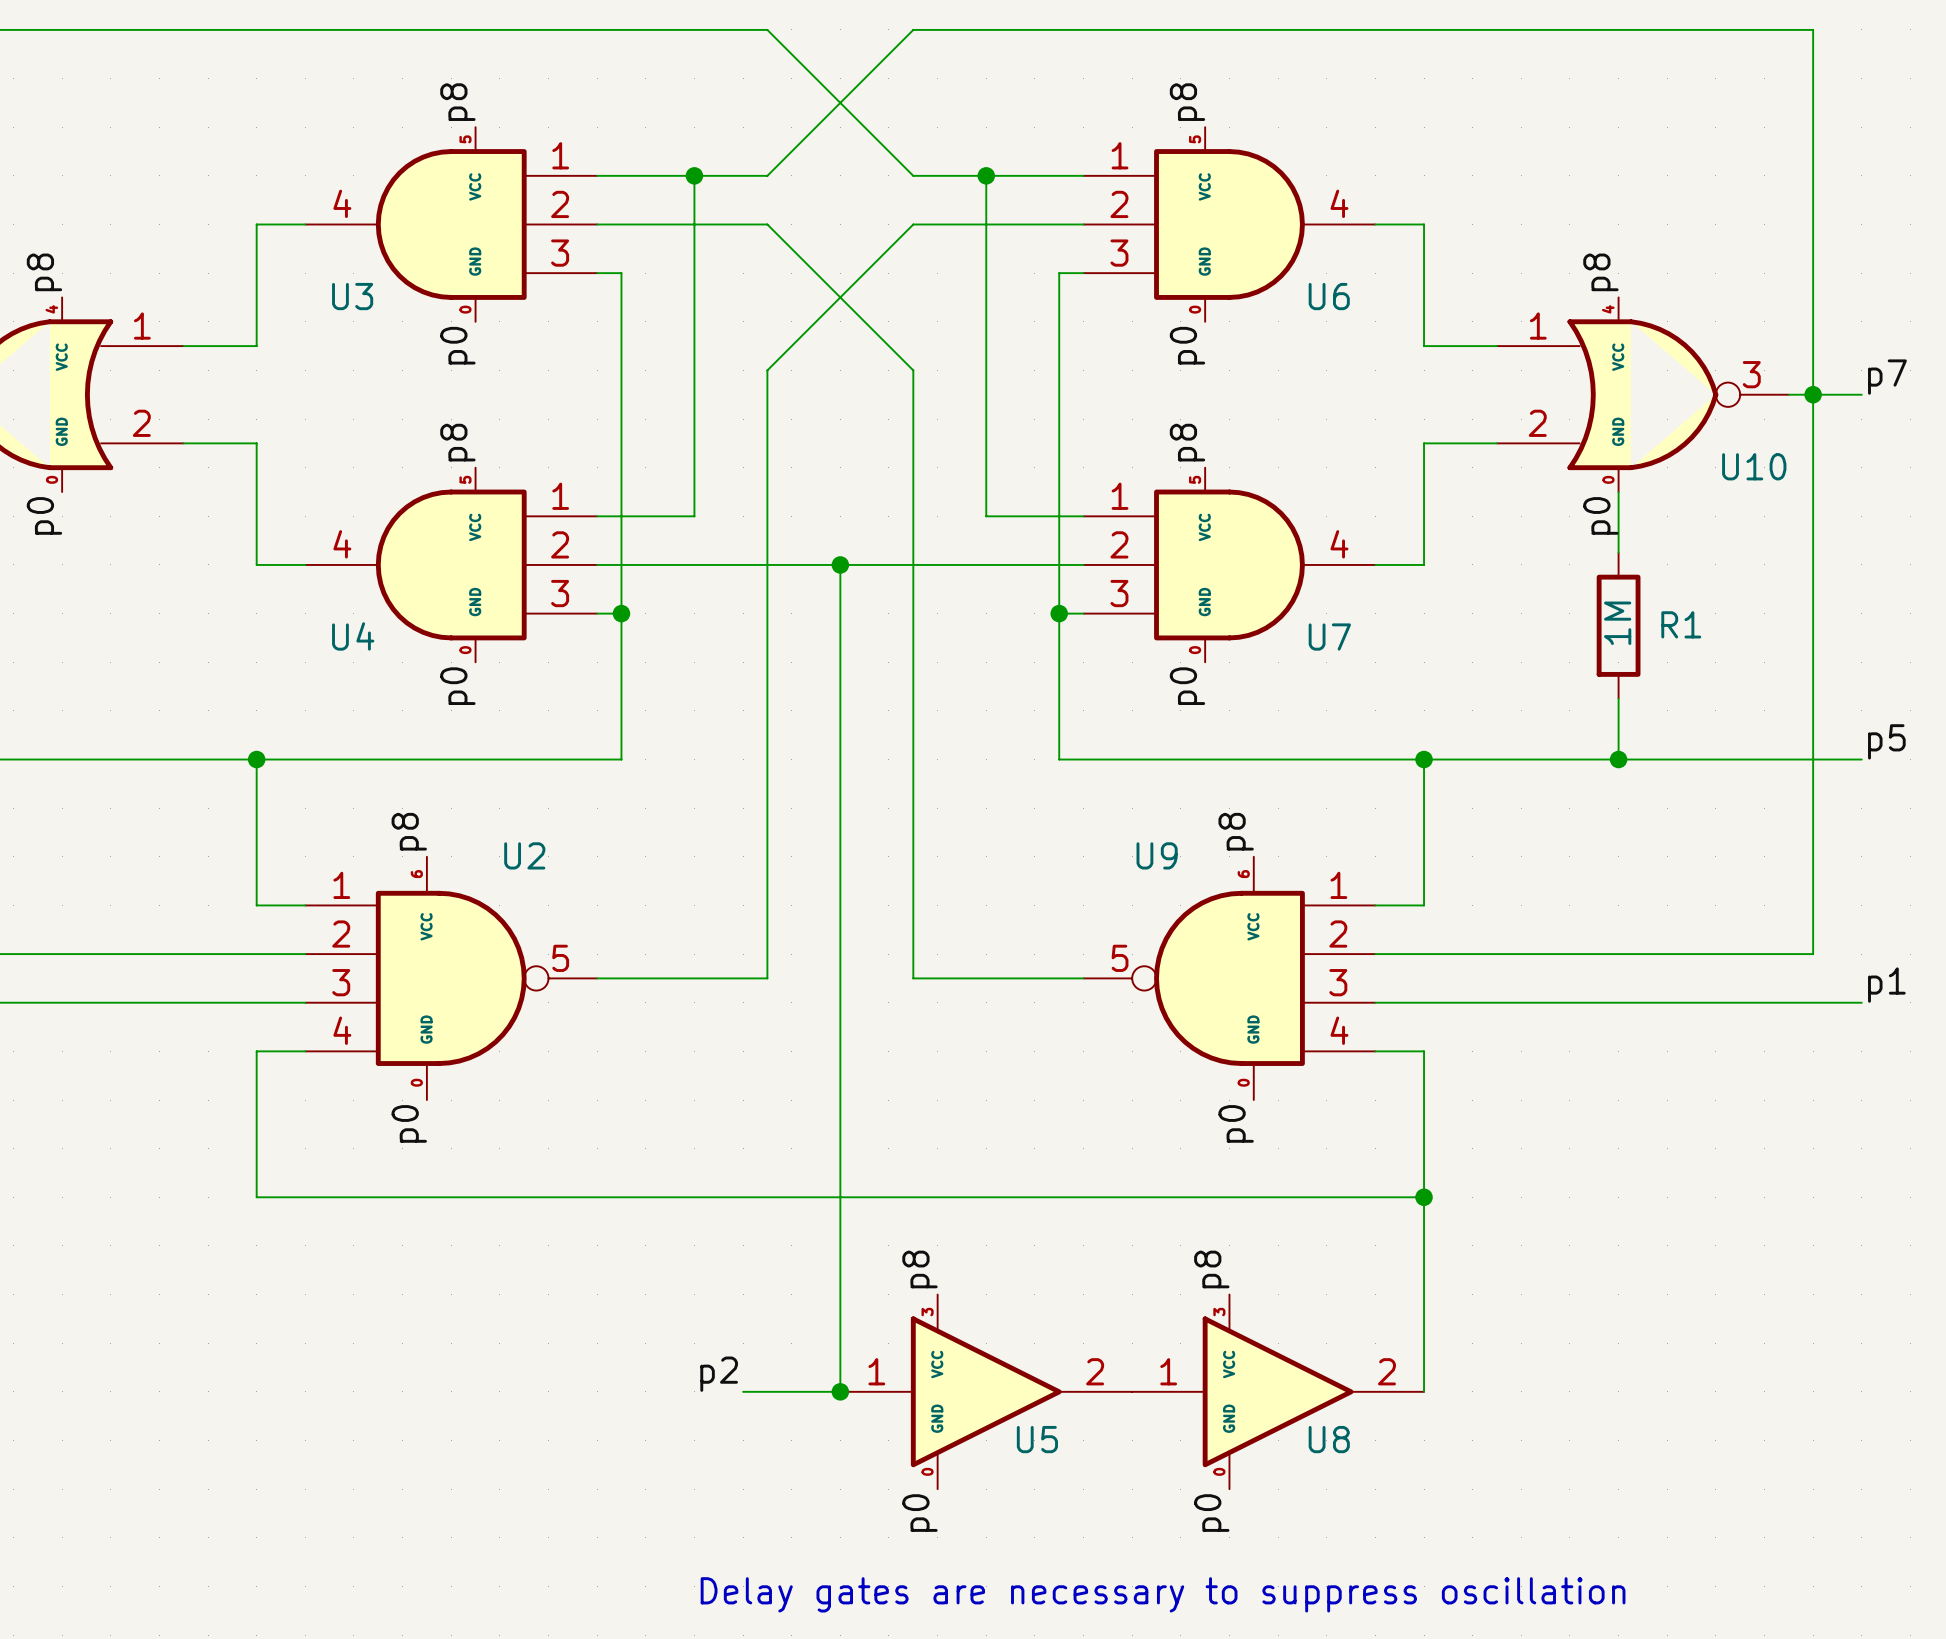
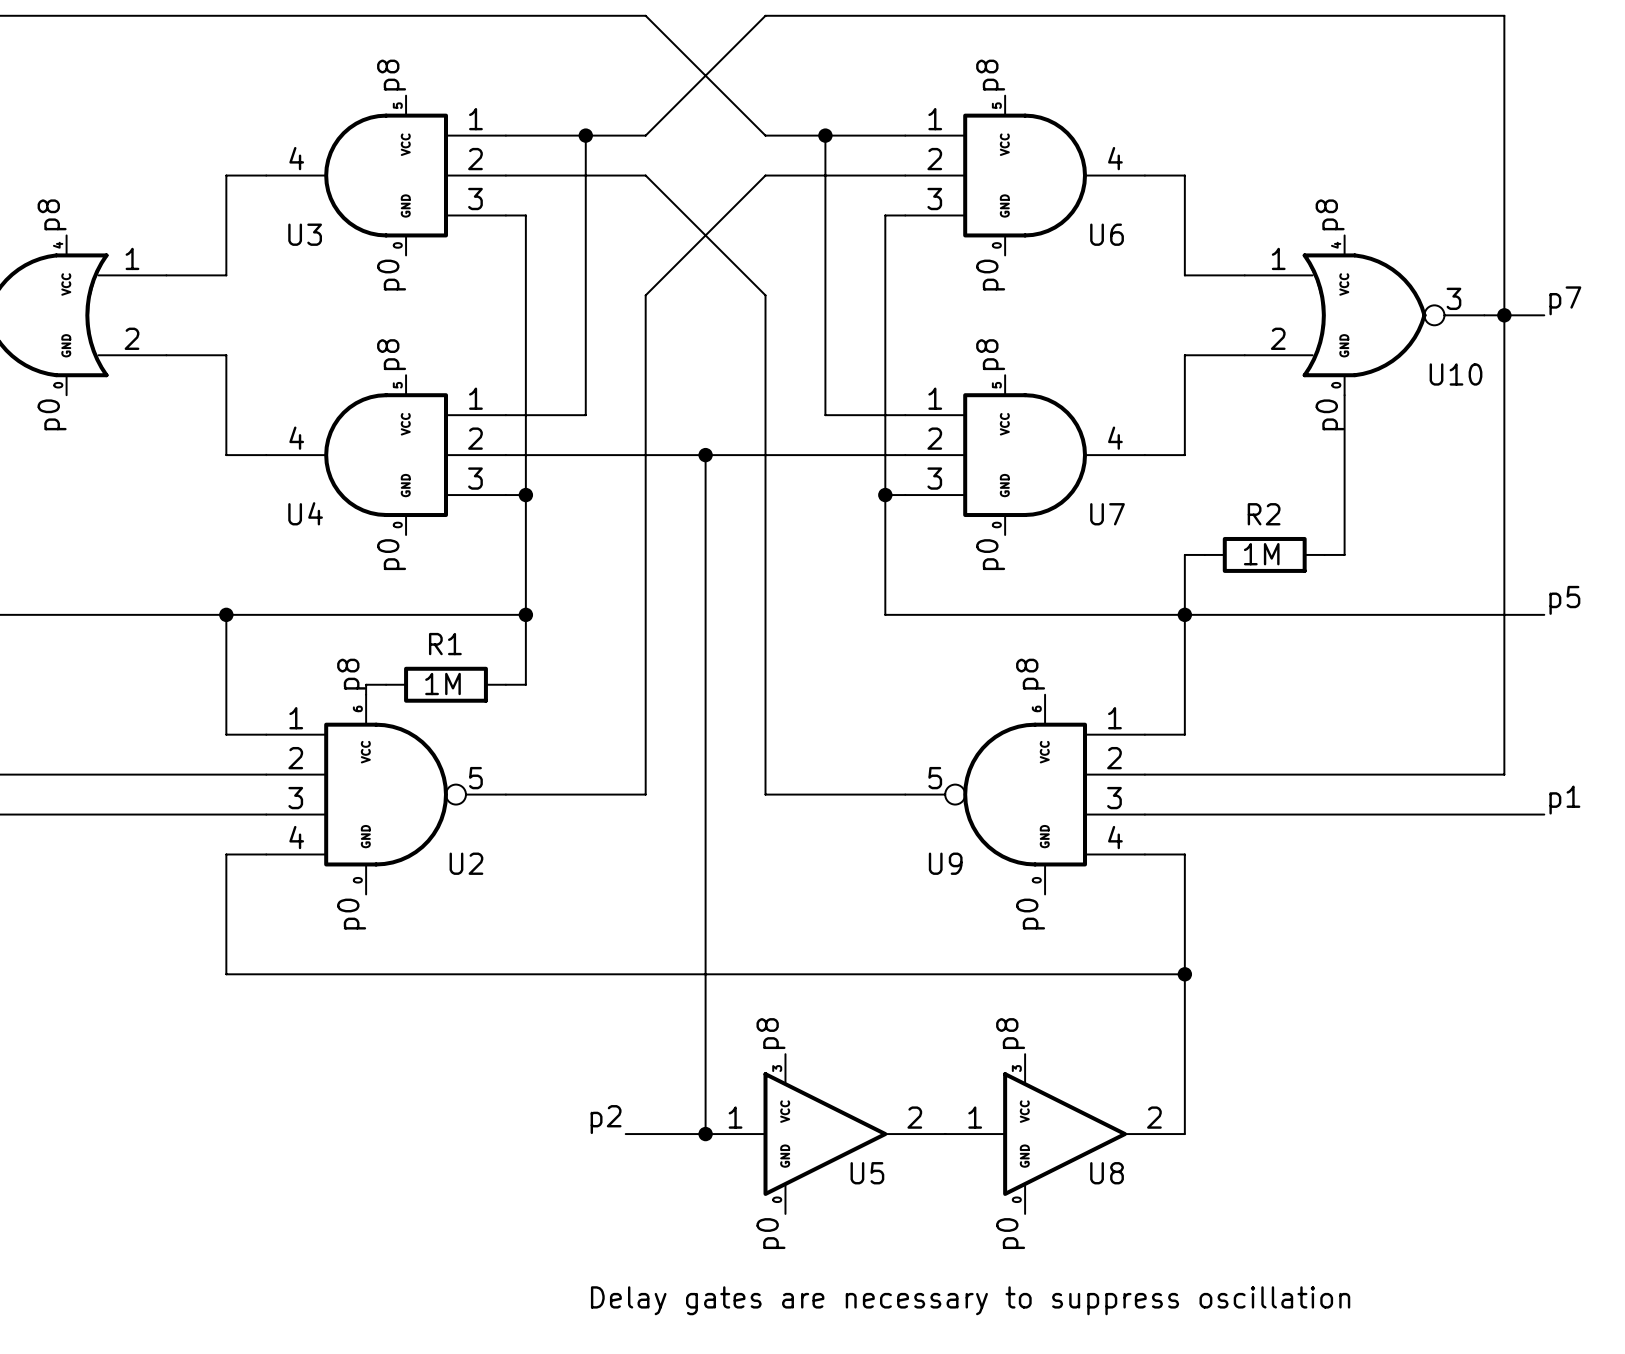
wire: none -> (1344, 445) (1344, 554) (1324, 554)
R1 name position: R1 (1681, 624) -> R1 (445, 644)
R1 rotation: 0° (1618, 625) -> 90° clockwise (446, 684)
R1 position: (1618, 625) -> (446, 684)
wire: none -> (1204, 554) (1184, 554) (1184, 614)
R2: none -> 1M (1264, 554)
wire: (1618, 698) (1618, 759) -> none
wire: none -> (525, 614) (525, 684) (505, 684)
junction: none -> (525, 614)
junction: (1618, 759) -> none
wire: none -> (386, 684) (366, 684) (366, 694)
U2 name position: U2 (524, 855) -> U2 (466, 863)
U9 name position: U9 (1157, 855) -> U9 (945, 863)

